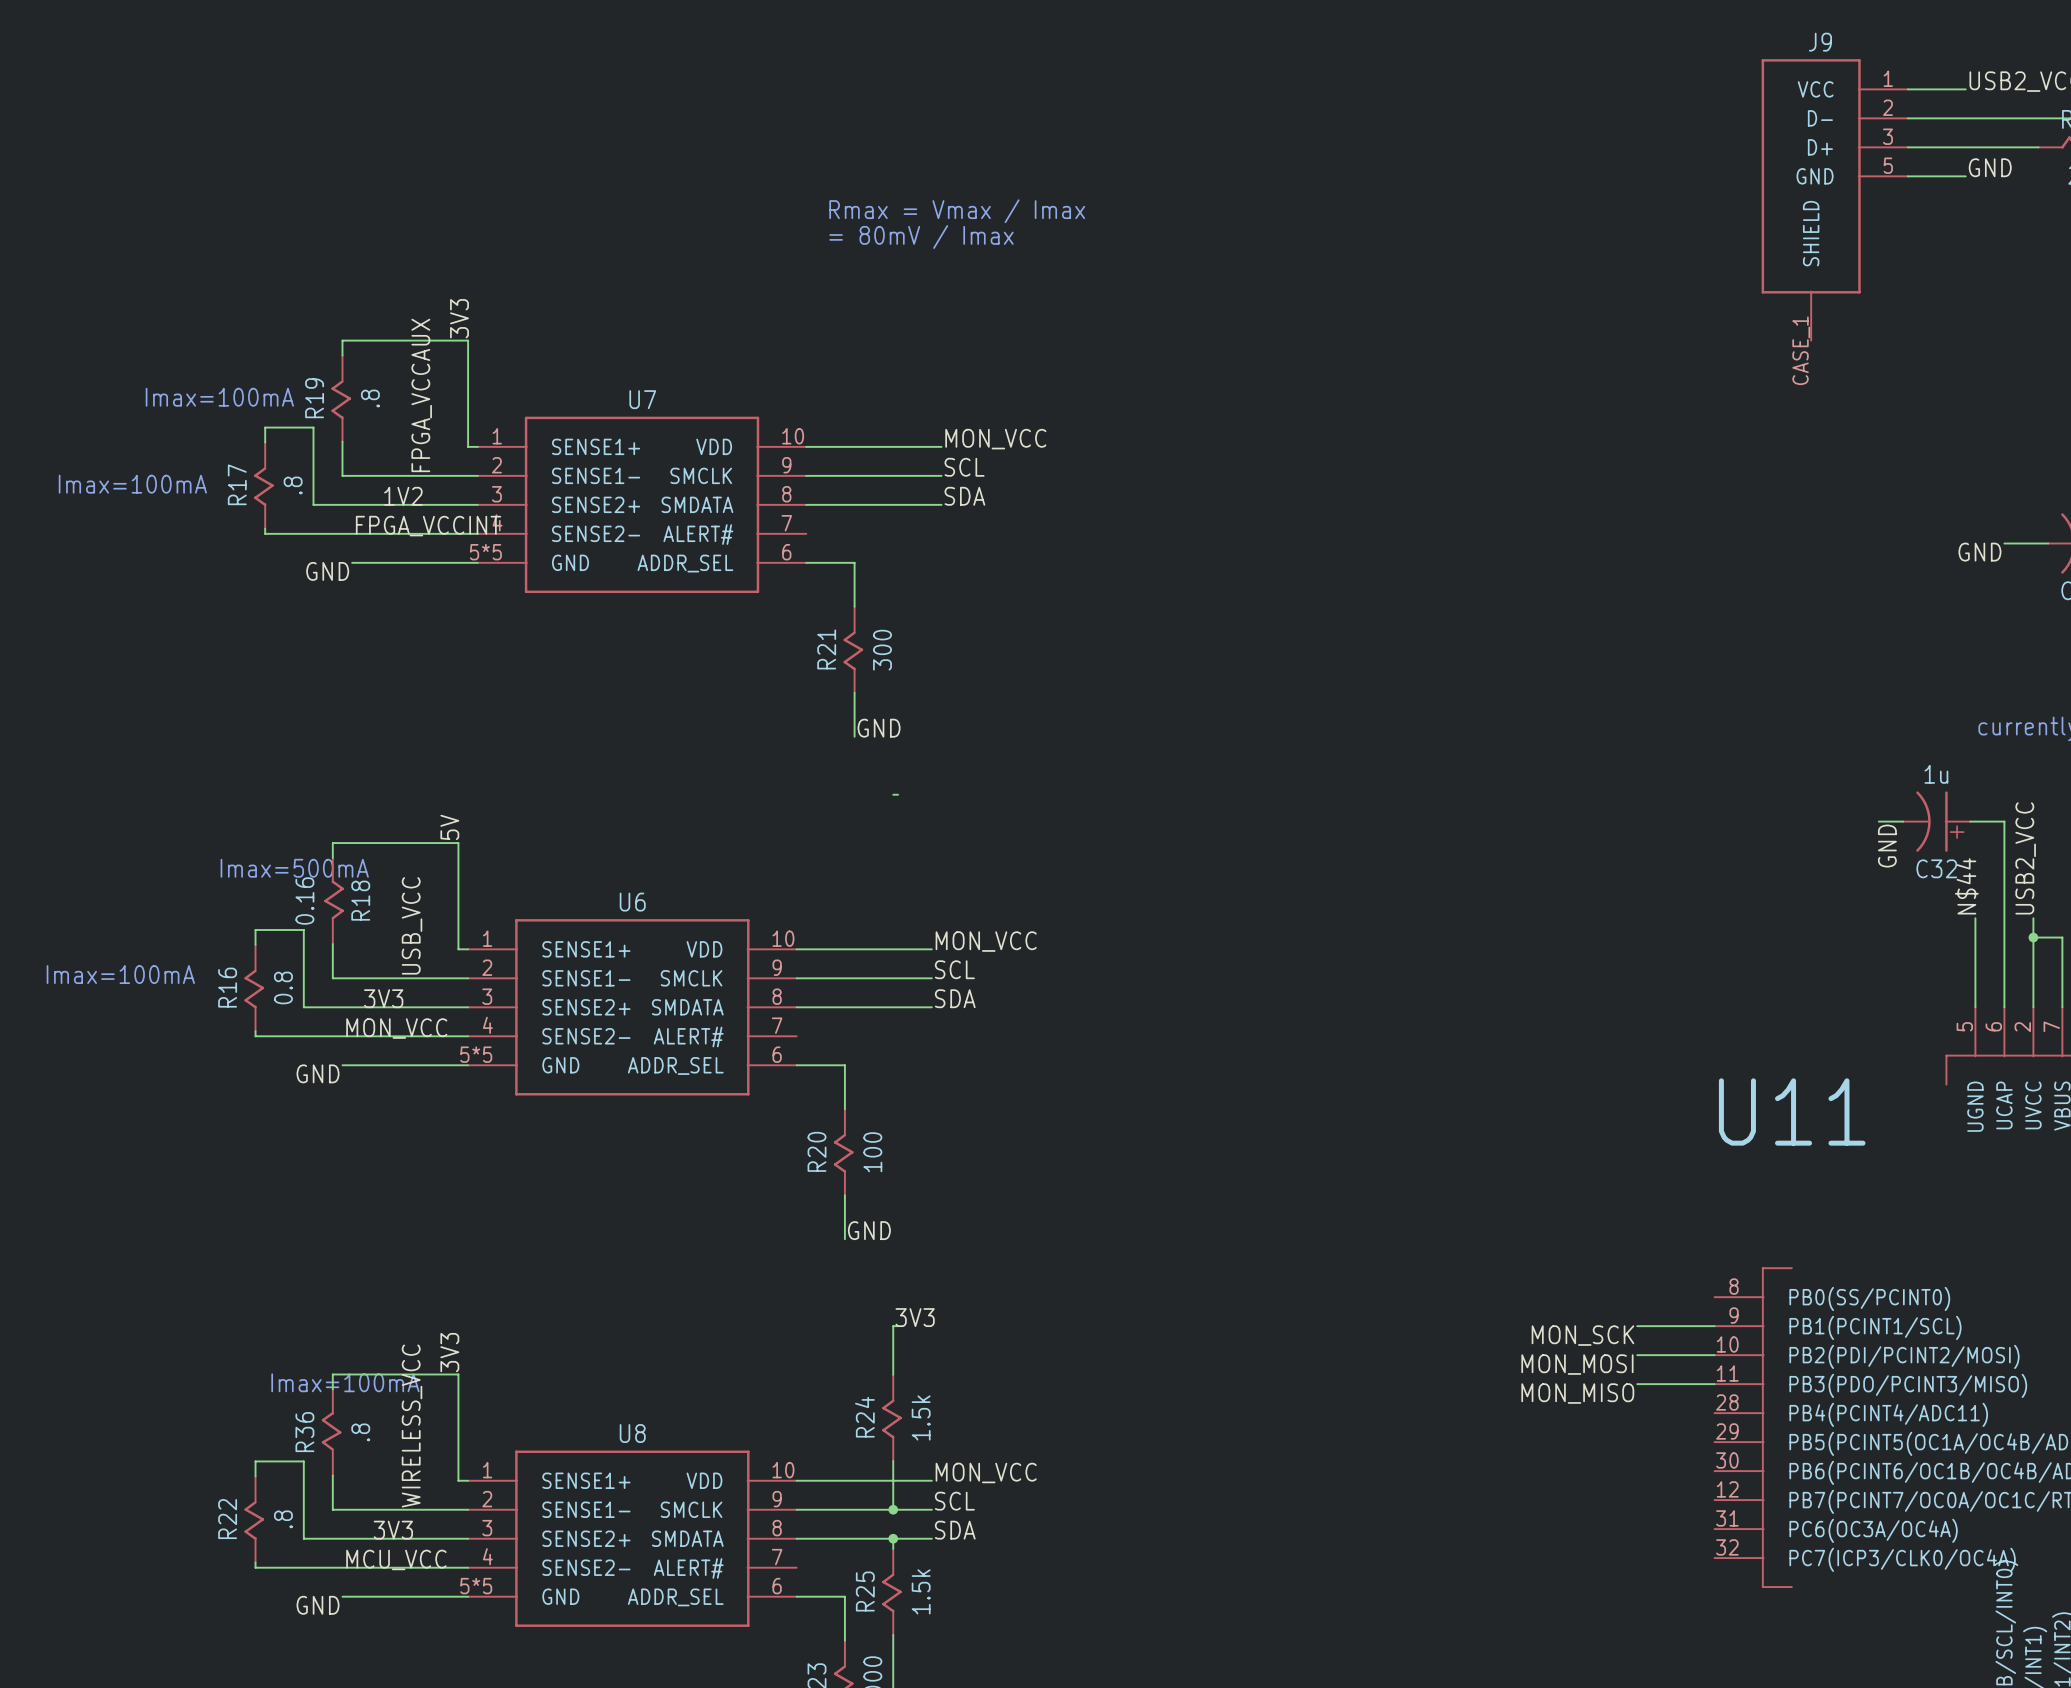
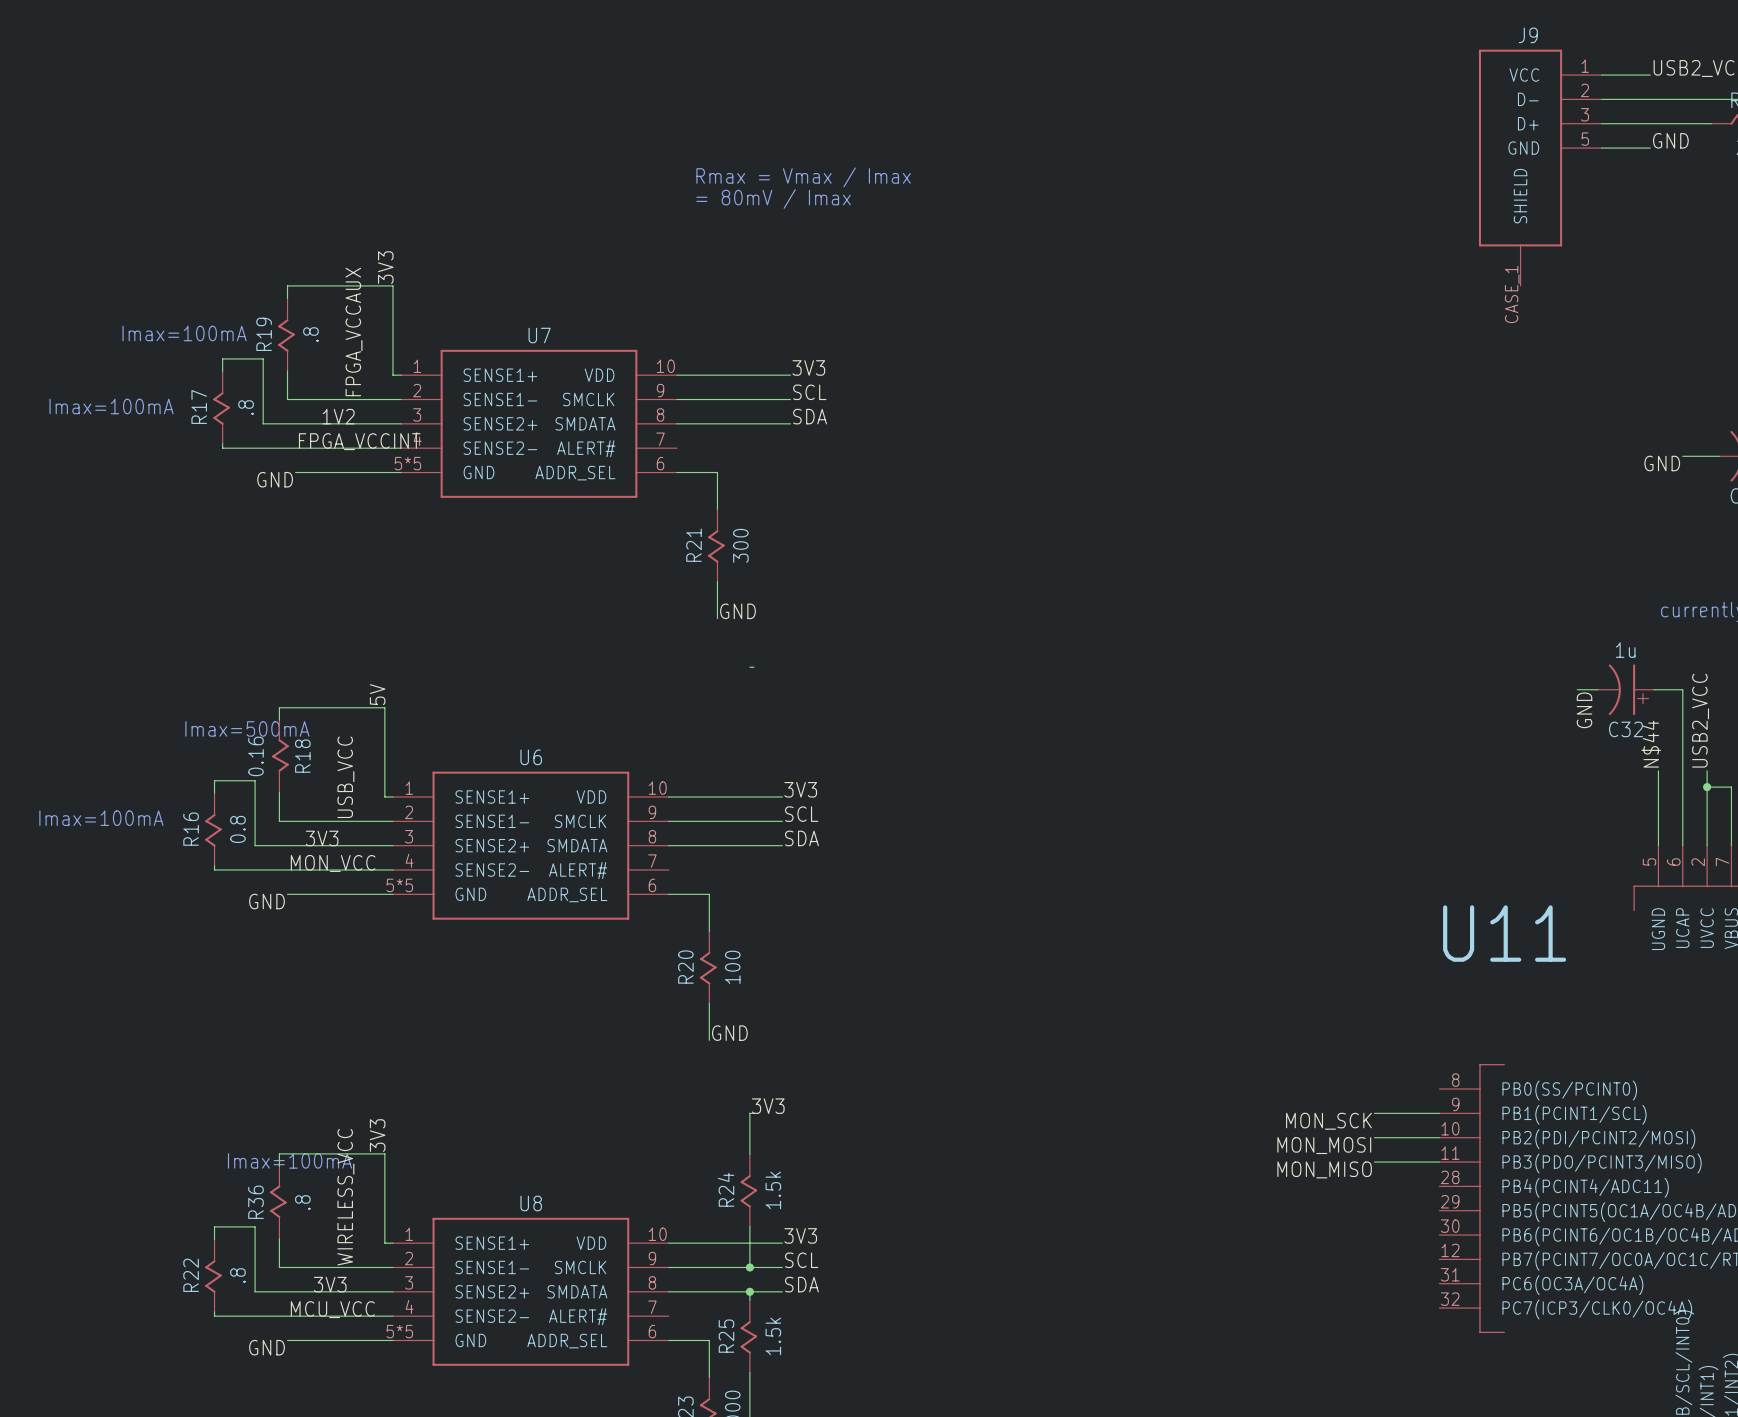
label: MON_VCC (995, 439) -> 3V3 (808, 367)
label: MON_VCC (986, 941) -> 3V3 (800, 789)
label: MON_VCC (986, 1472) -> 3V3 (800, 1235)

